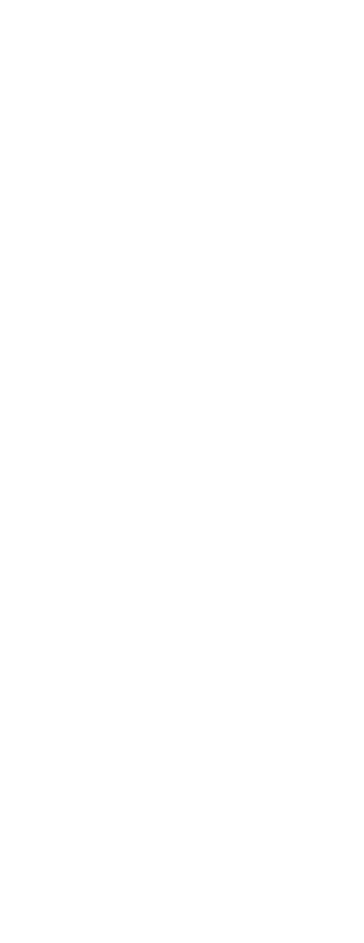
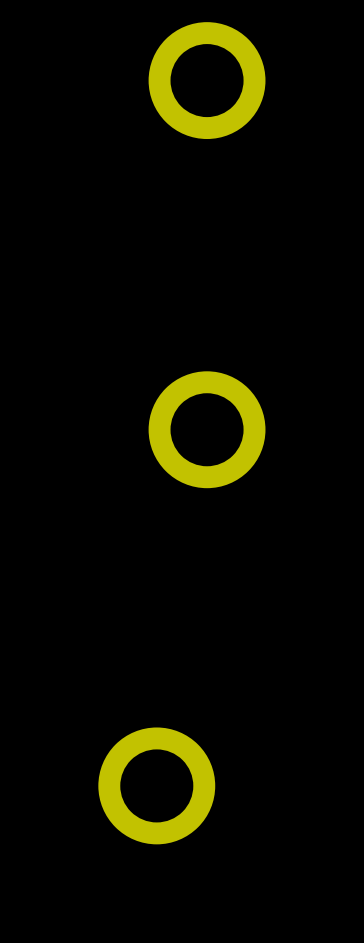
part: none -> (207, 80)
part: none -> (207, 429)
part: none -> (156, 785)

